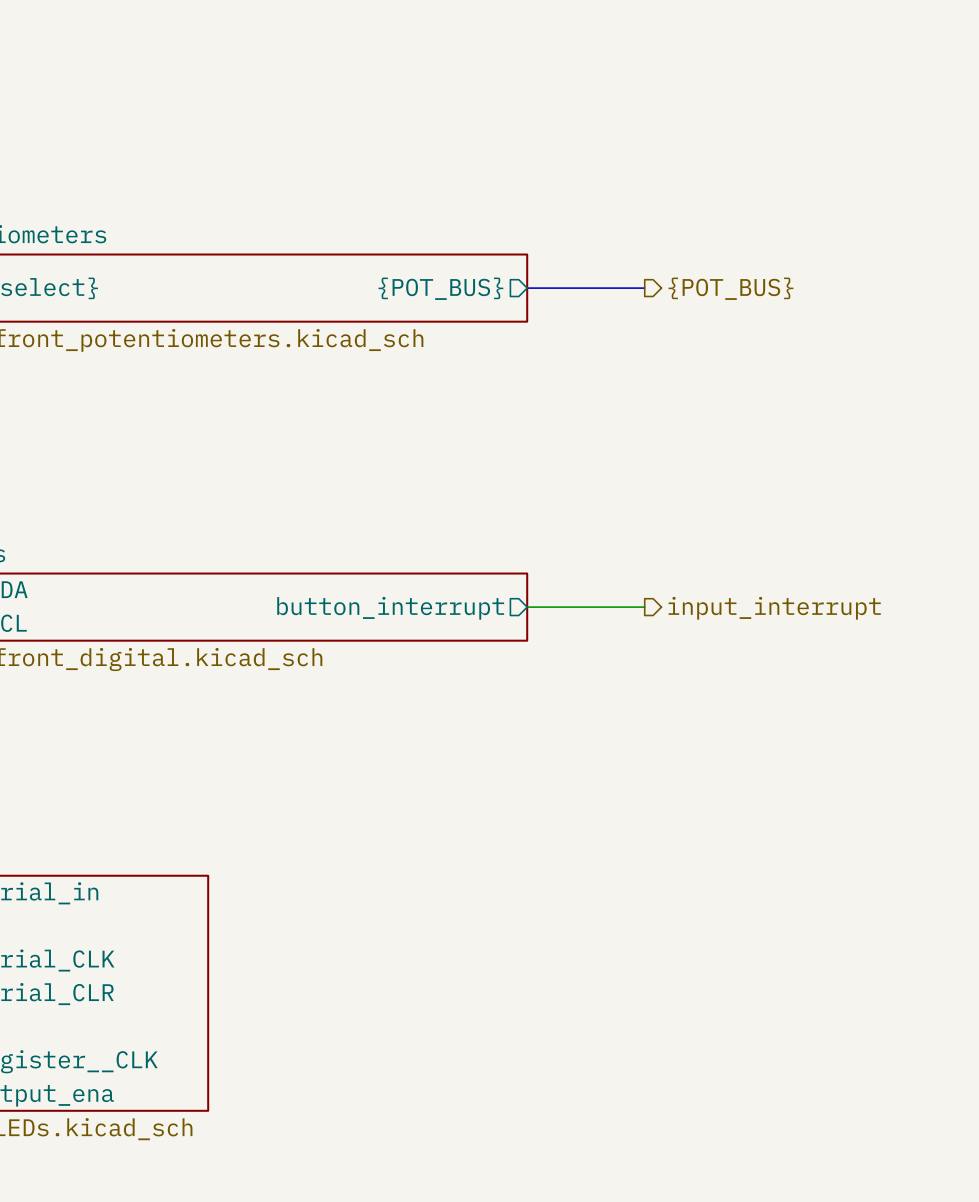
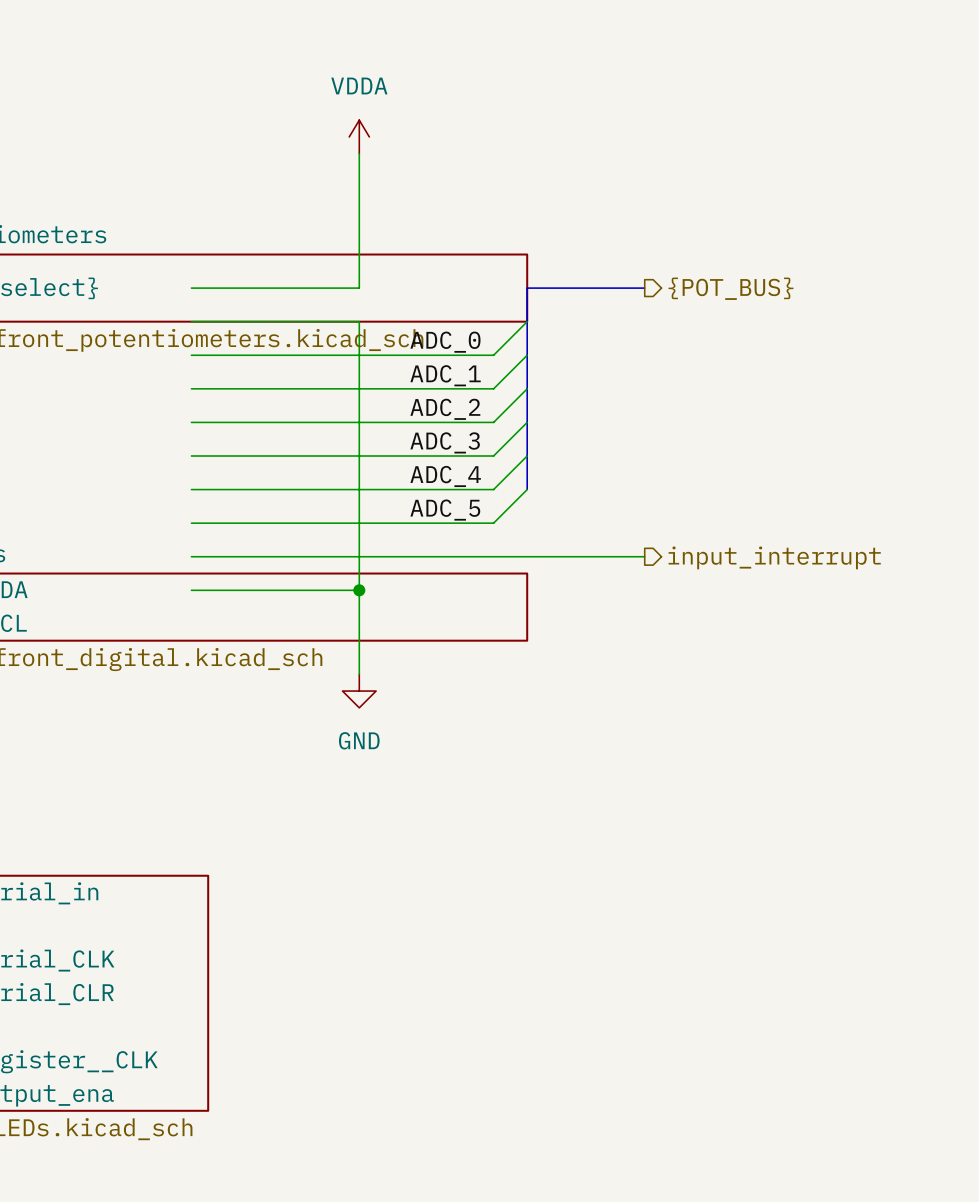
power symbol: none -> VDDA (359, 136)
wire: none -> (359, 153) (359, 288) (191, 288)
sheet pin: {POT_BUS} (440, 288) -> none
bus: none -> (527, 288) (527, 489)
wire: none -> (191, 321) (359, 321) (359, 674)
wire: none -> (527, 321) (493, 355) (191, 355)
label: none -> ADC_0 (445, 342)
wire: none -> (527, 355) (493, 388) (191, 388)
label: none -> ADC_1 (445, 375)
wire: none -> (527, 388) (493, 422) (191, 422)
label: none -> ADC_2 (445, 409)
wire: none -> (527, 422) (493, 456) (191, 456)
label: none -> ADC_3 (445, 442)
wire: none -> (527, 456) (493, 489) (191, 489)
label: none -> ADC_4 (445, 476)
wire: none -> (527, 489) (493, 523) (191, 523)
label: none -> ADC_5 (445, 510)
wire: none -> (191, 556) (644, 556)
wire: none -> (191, 590) (359, 590)
junction: none -> (359, 590)
wire: (527, 607) (644, 607) -> none
sheet pin: button_interrupt (390, 608) -> none
hierarchical label position: input_interrupt (774, 608) -> input_interrupt (774, 557)
power symbol: none -> GND (359, 691)

